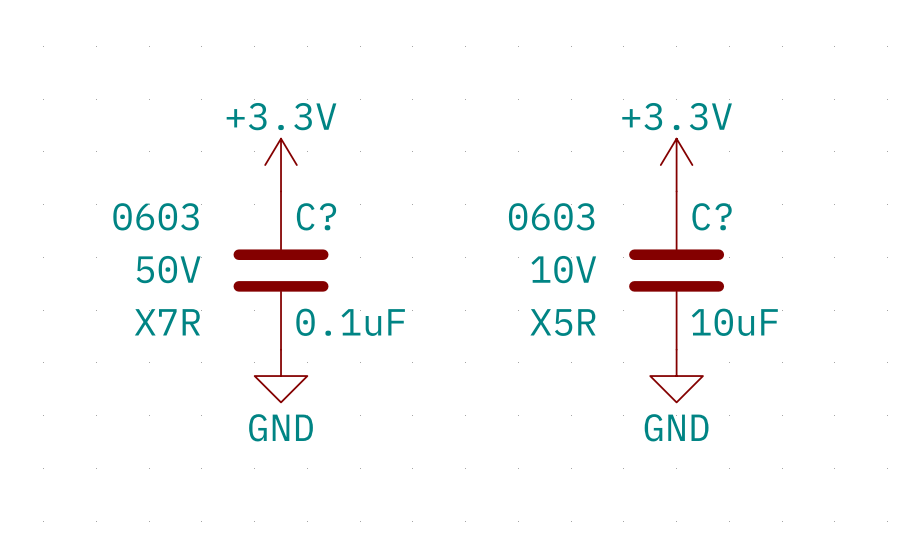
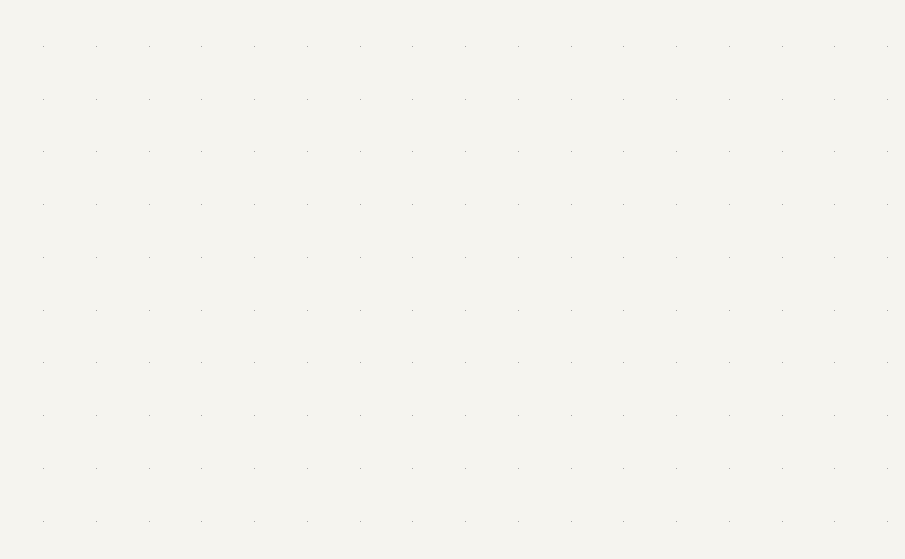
power symbol: +3.3V (281, 165) -> none
power symbol: +3.3V (676, 165) -> none
C?: 0.1uF (281, 270) -> none
C?: 10uF (676, 270) -> none
power symbol: GND (281, 376) -> none
power symbol: GND (676, 376) -> none

